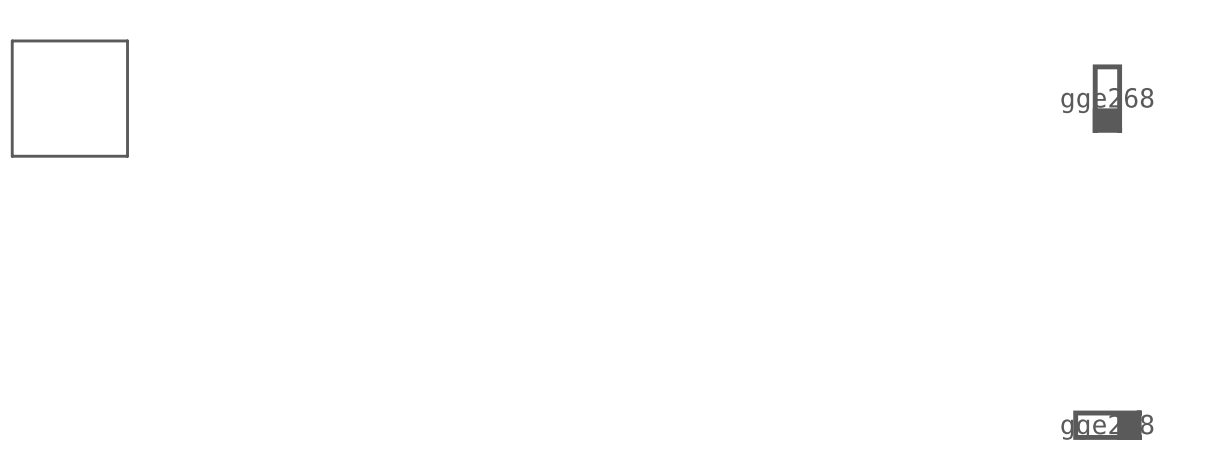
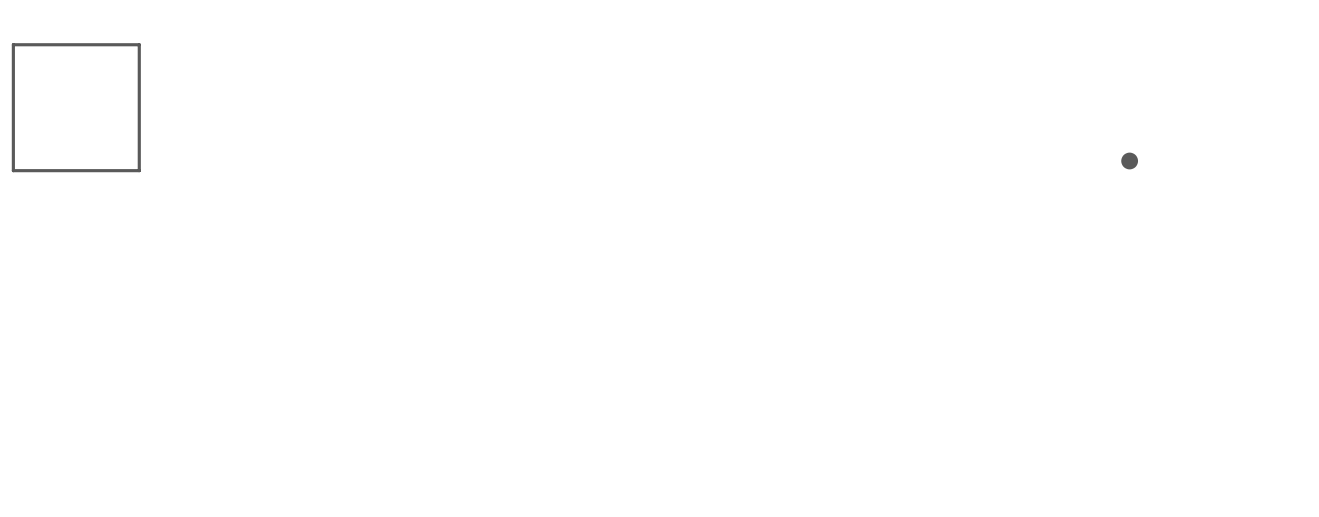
part: (1107, 98) -> none
part: none -> (1129, 161)
part: (1107, 425) -> none

